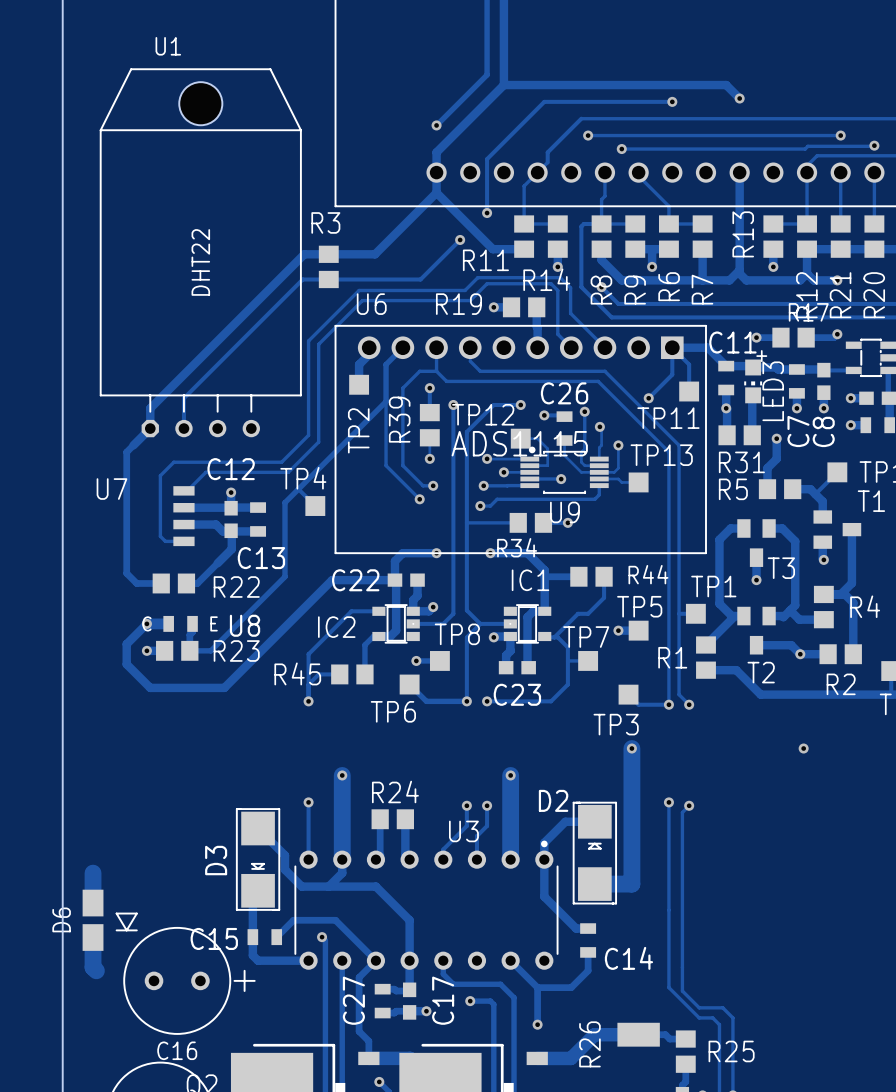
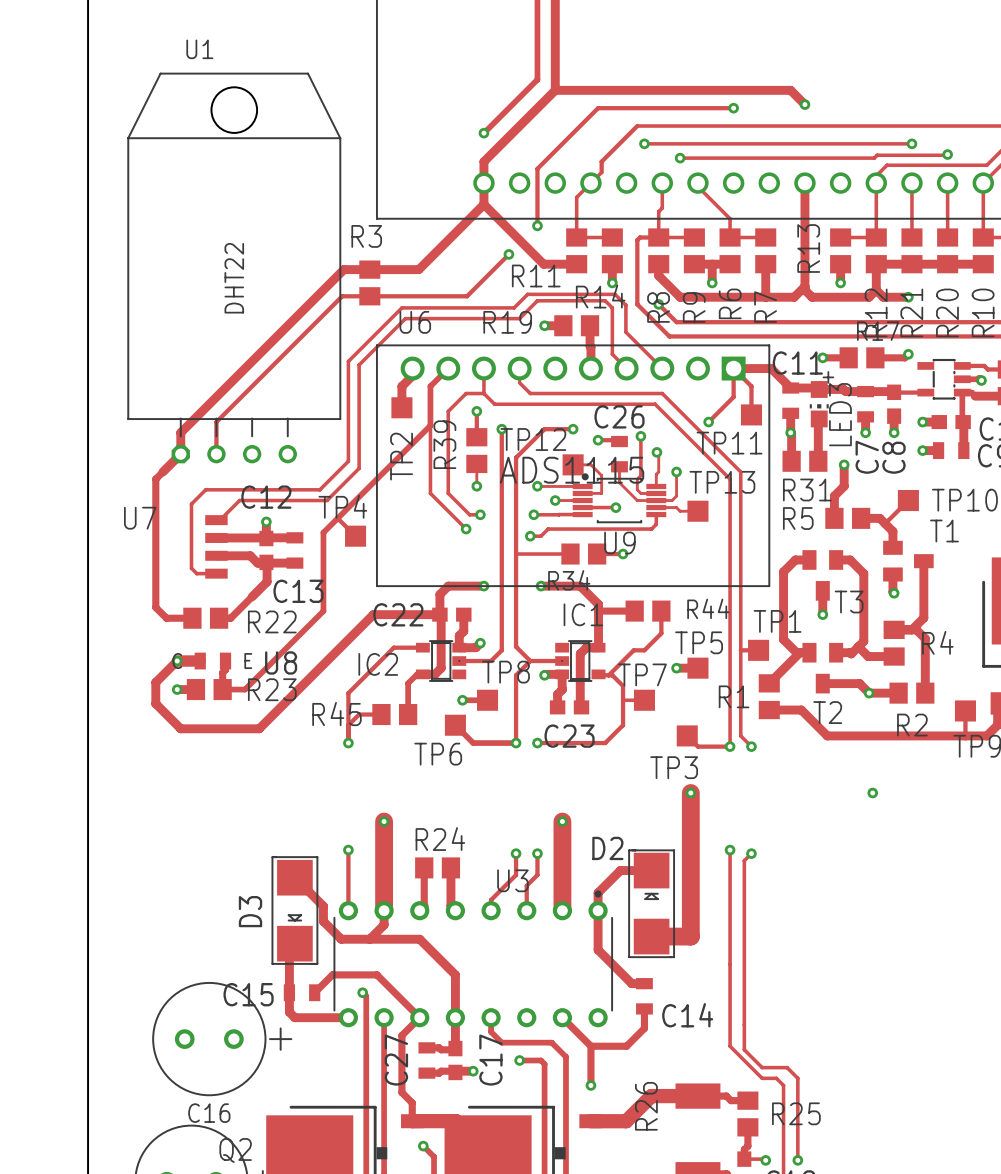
track: (93, 873) (93, 903) -> none
D6: (110, 920) -> none
track: (93, 937) (93, 967) (96, 970) -> none

